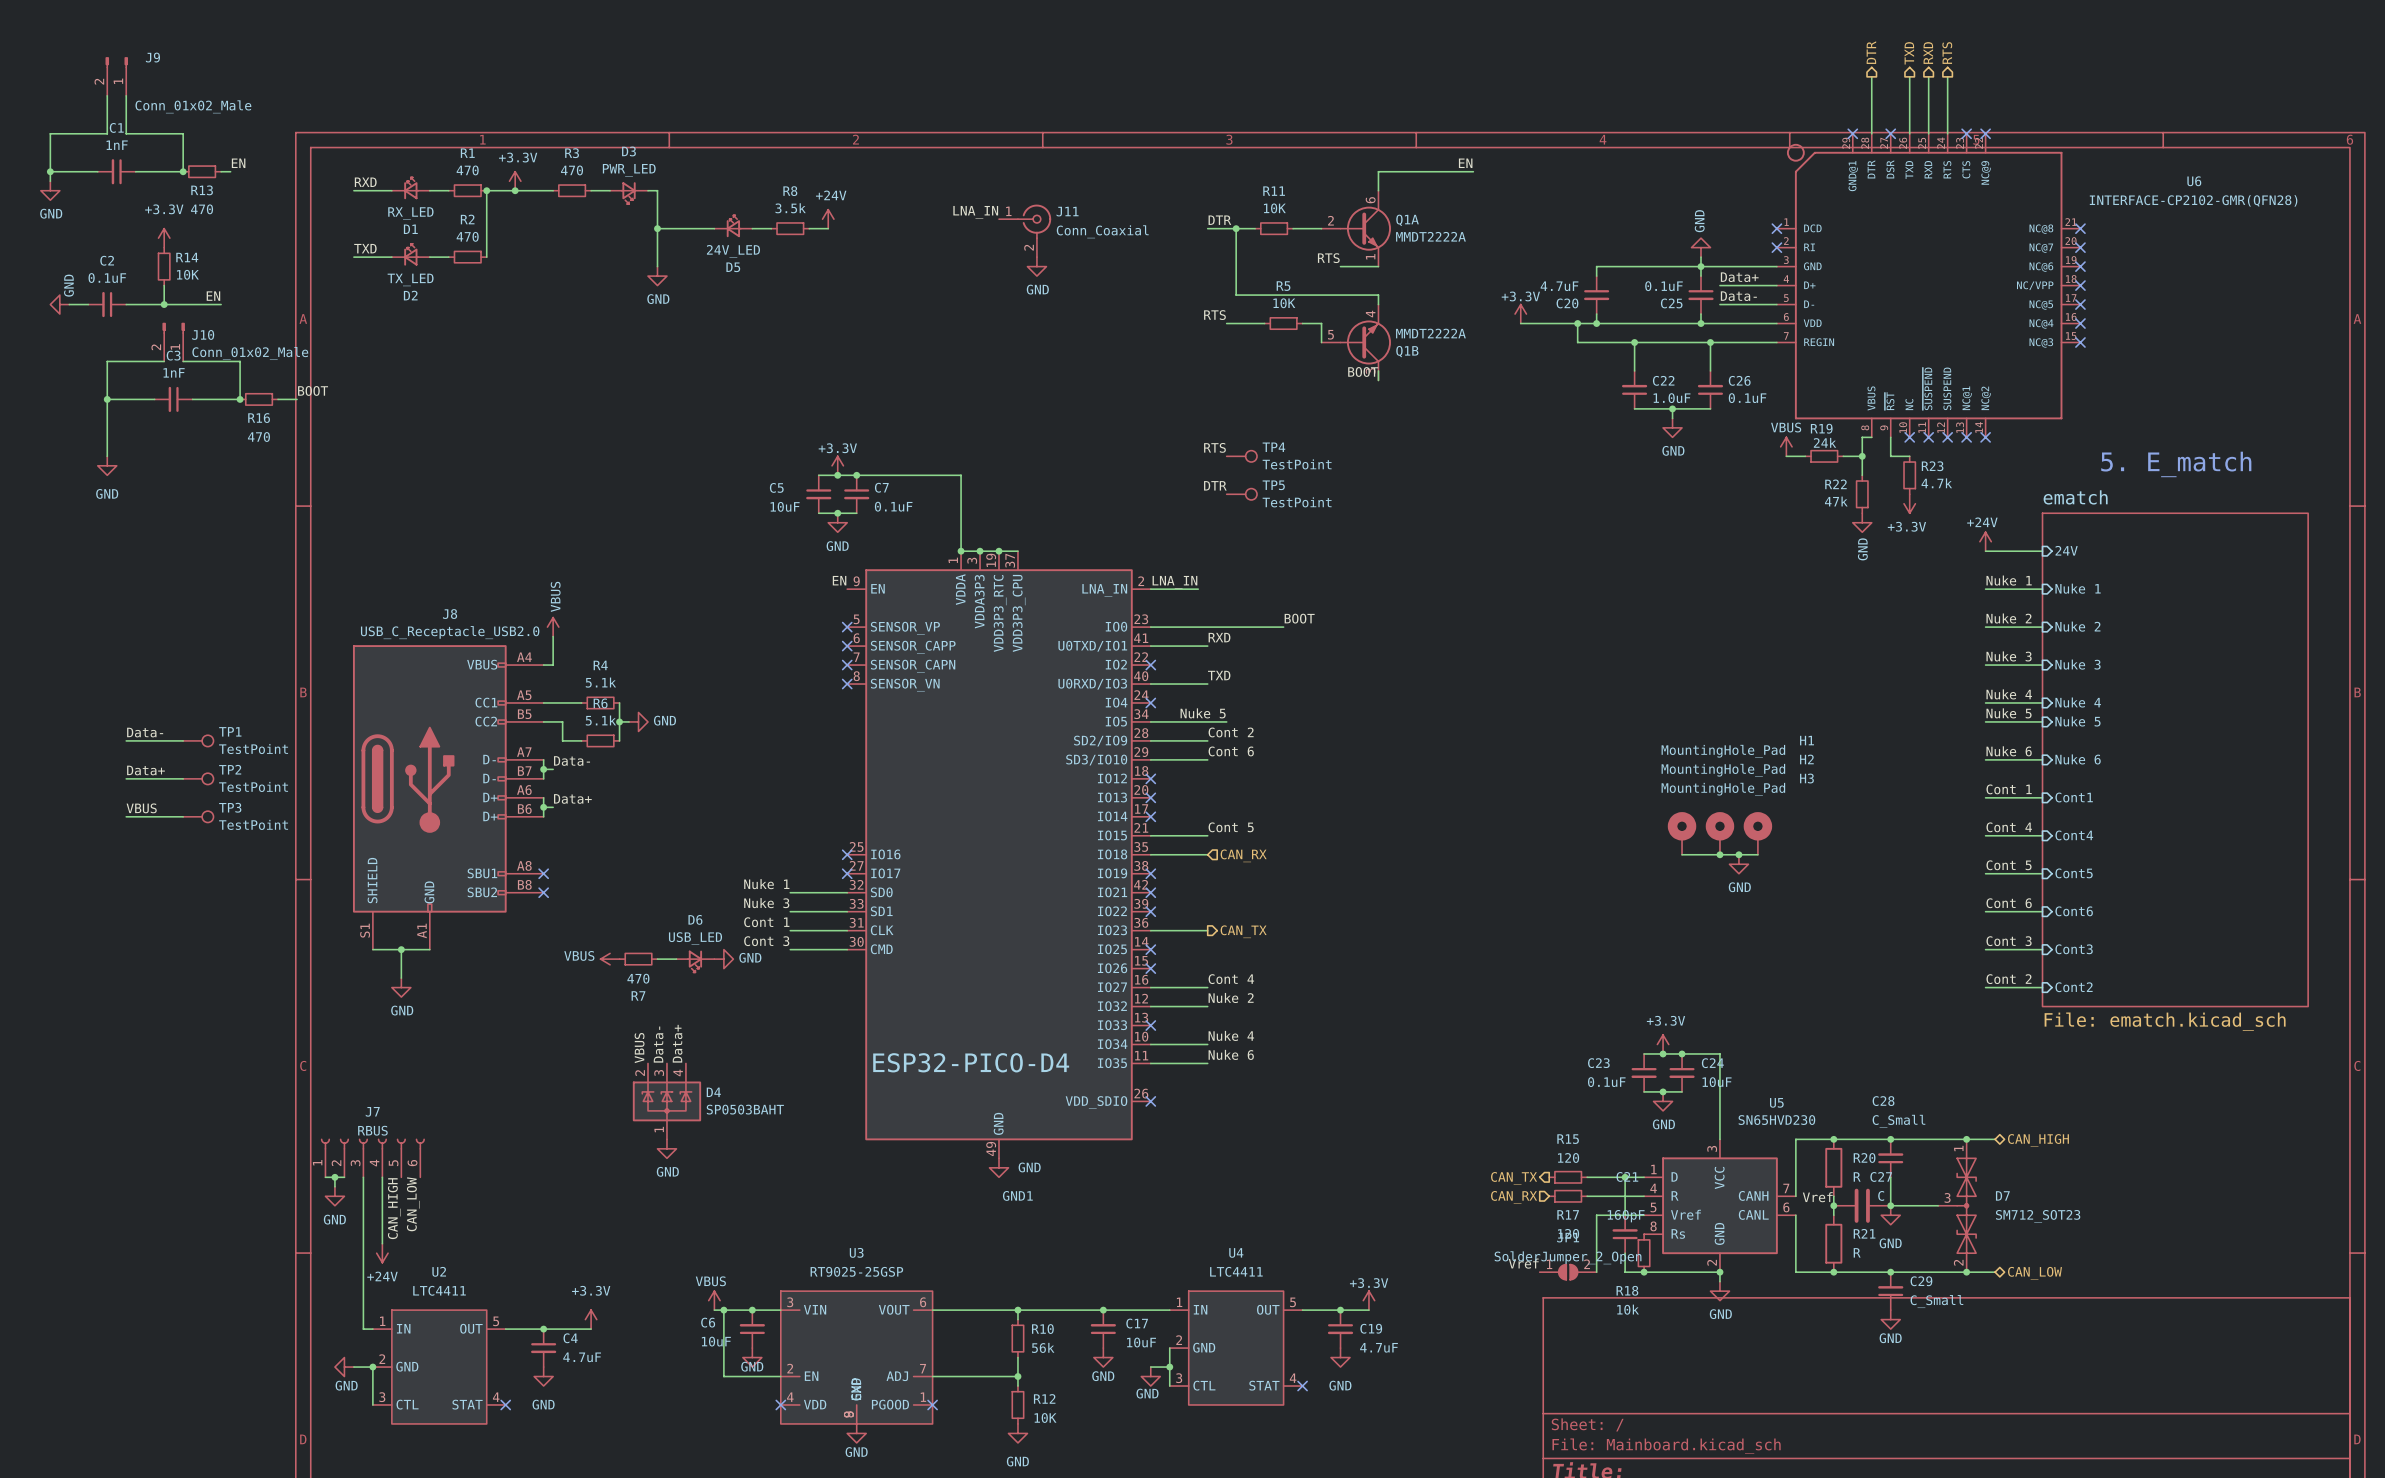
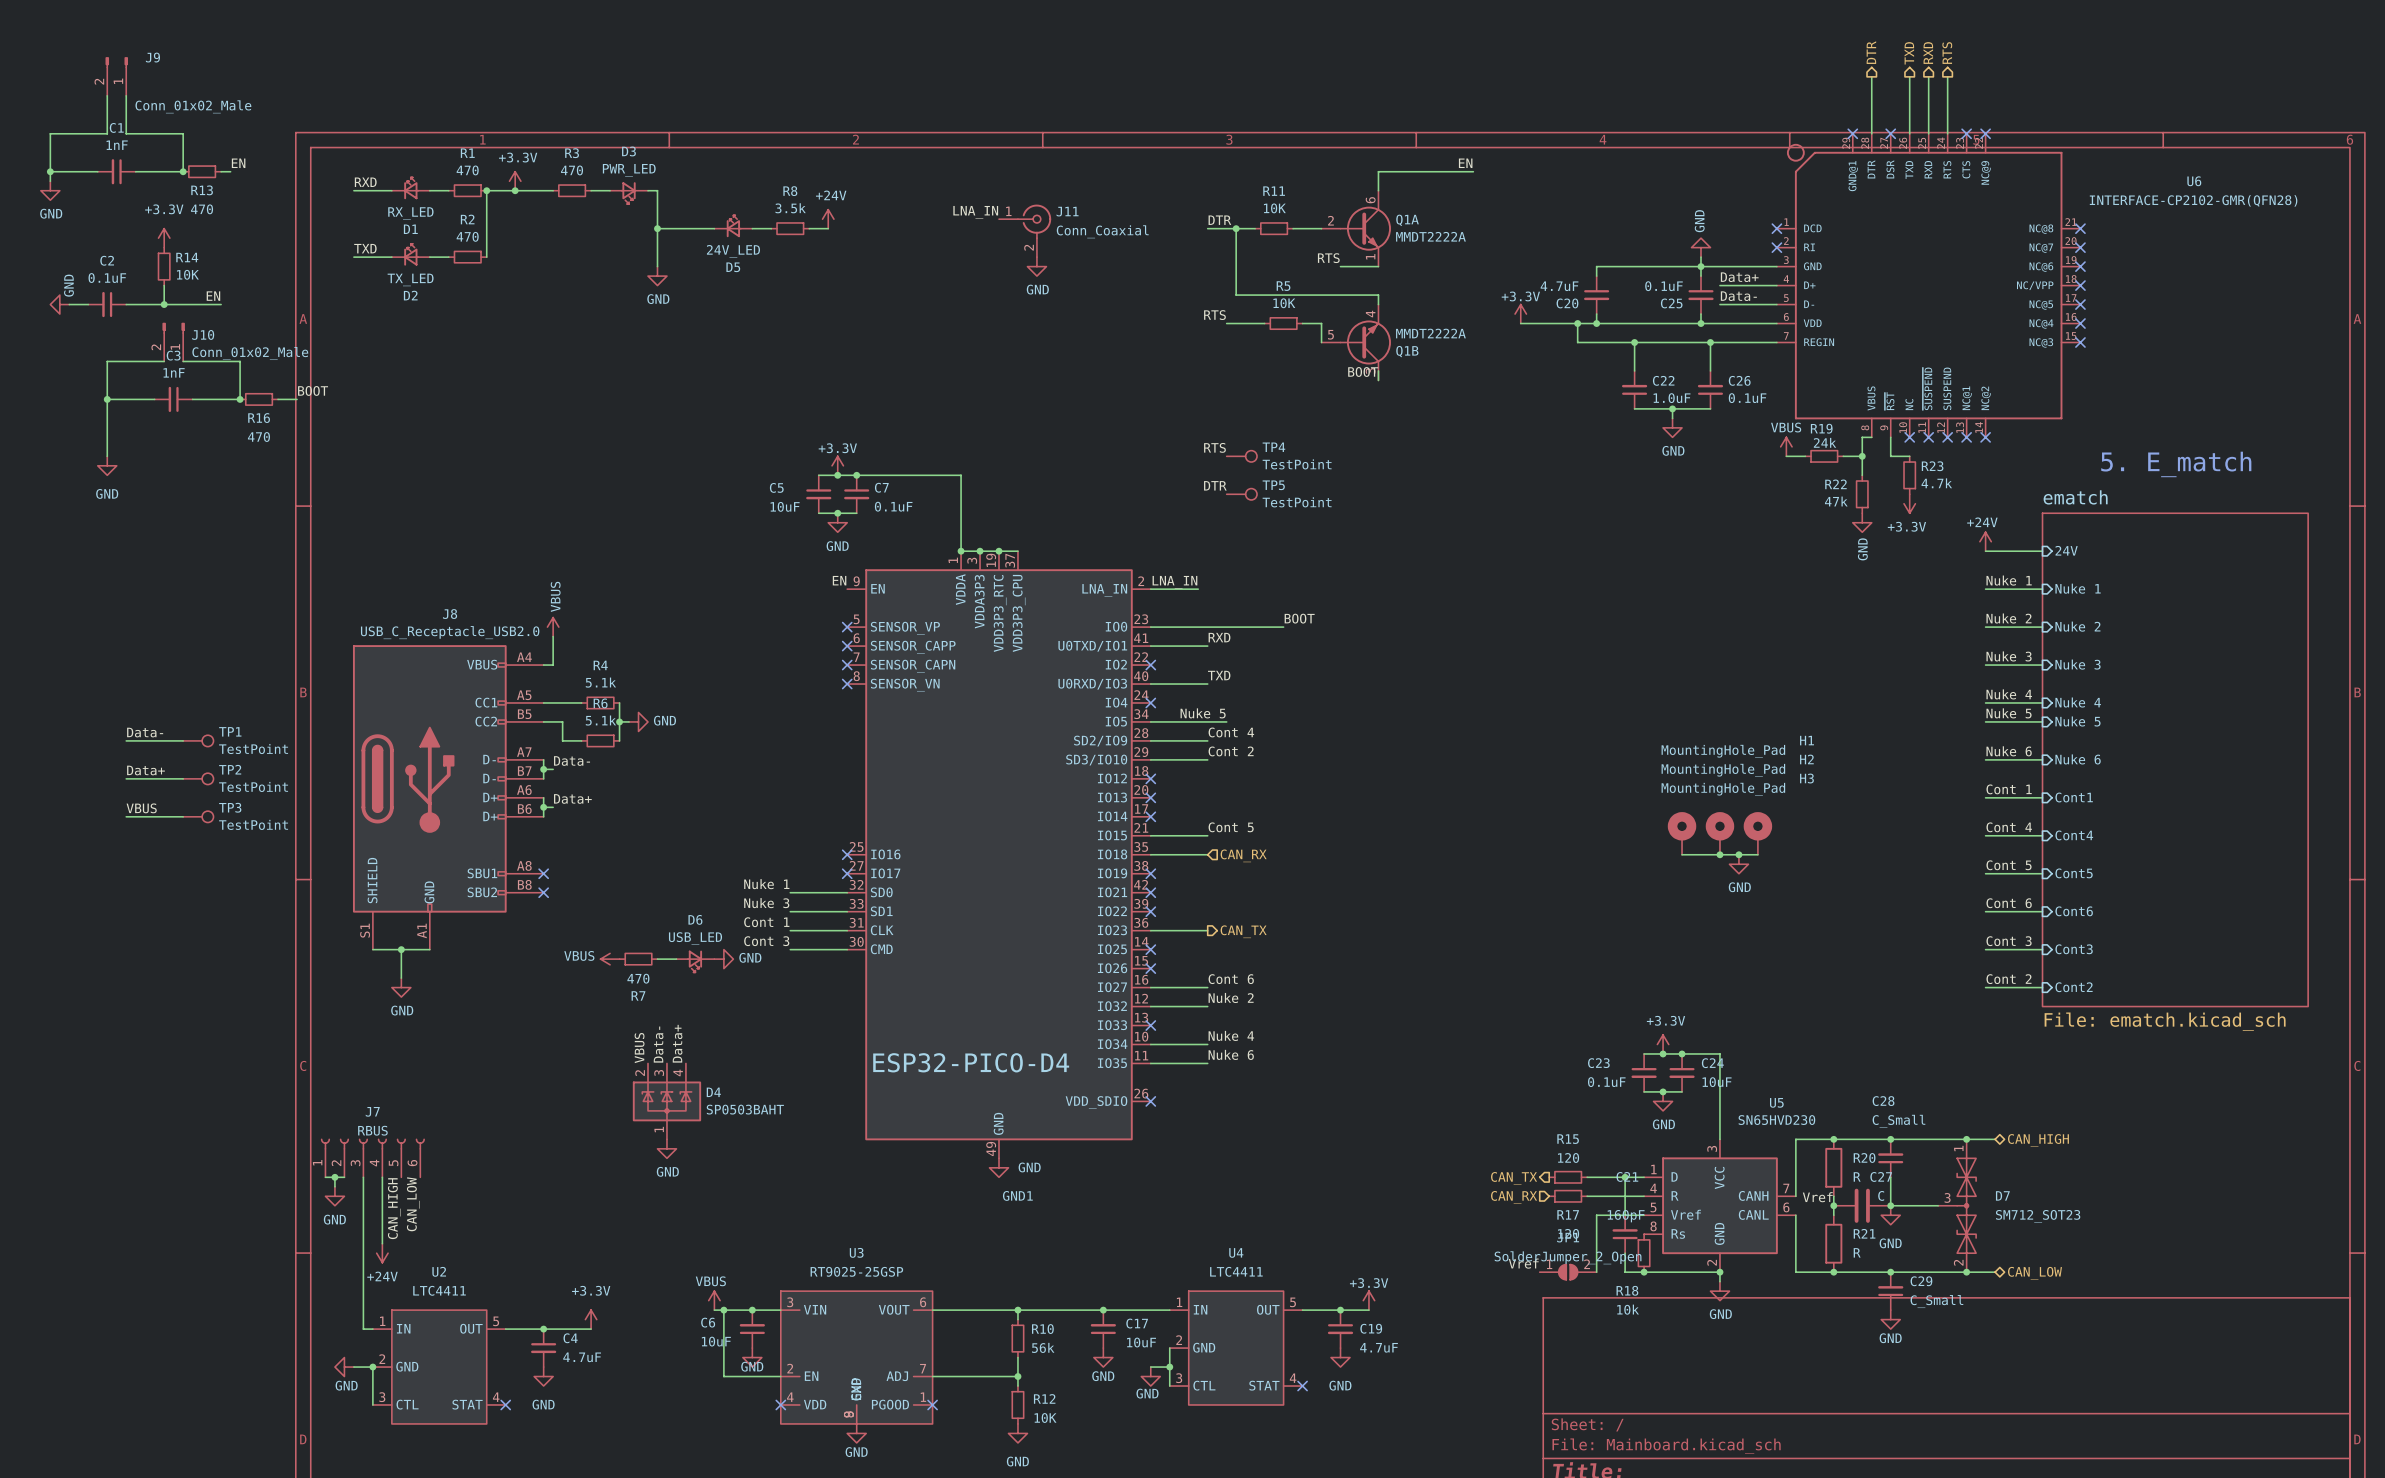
label: Cont 2 (1231, 732) -> Cont 4 (1231, 732)
label: Cont 6 (1231, 751) -> Cont 2 (1231, 751)
label: Cont 4 (1231, 979) -> Cont 6 (1231, 979)

